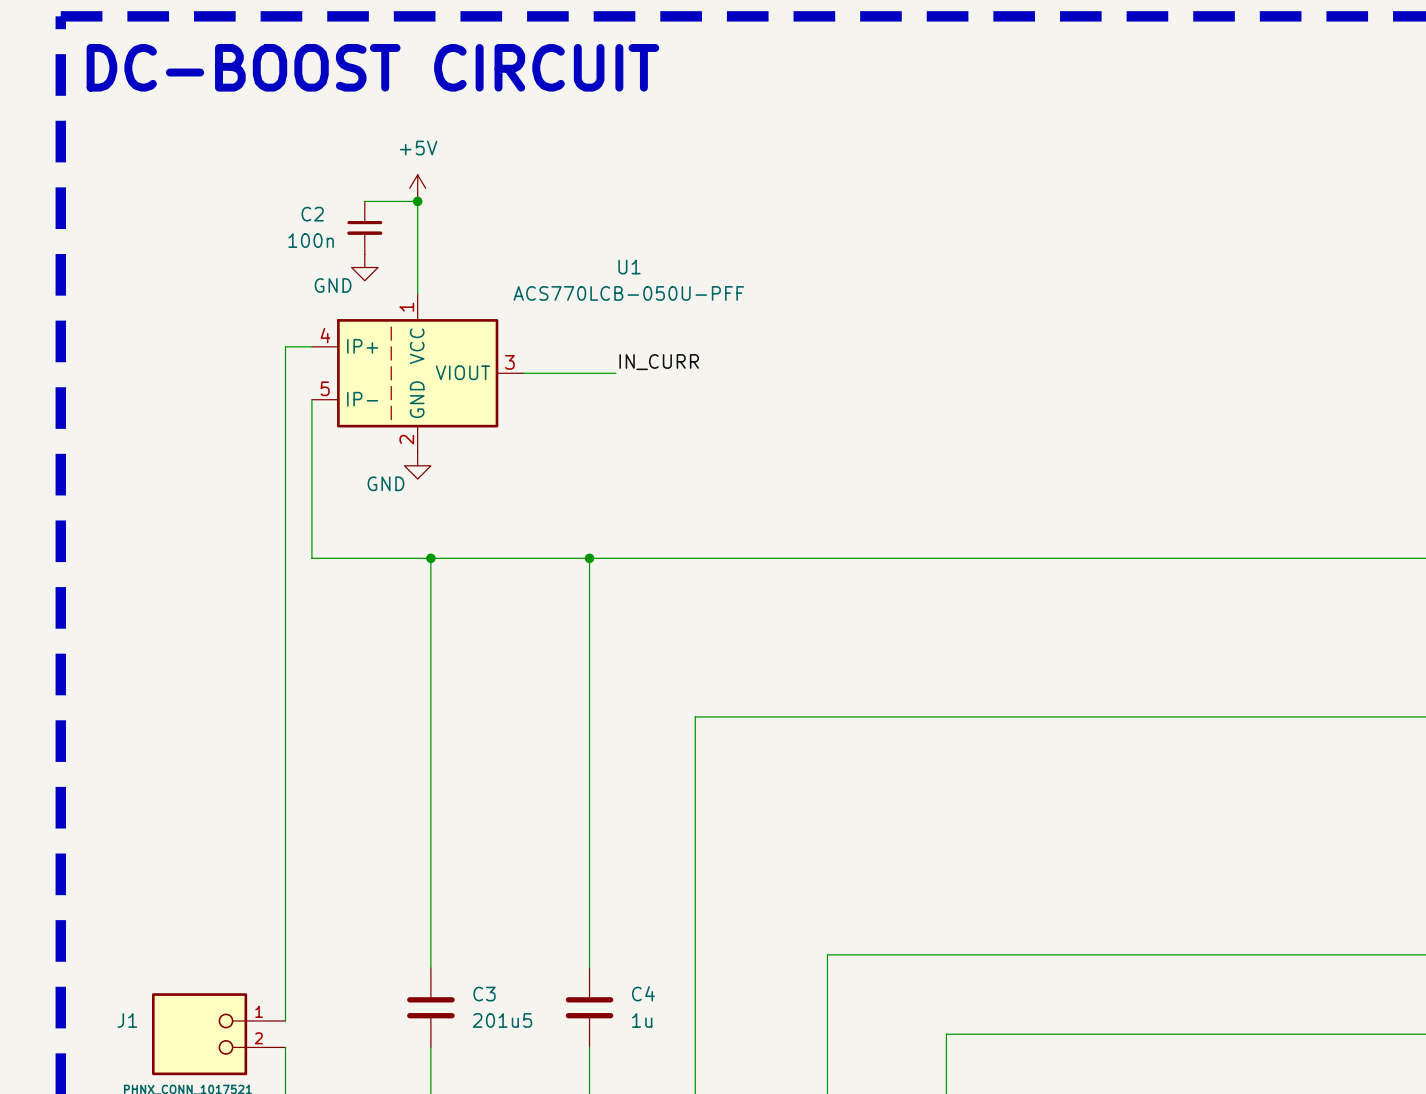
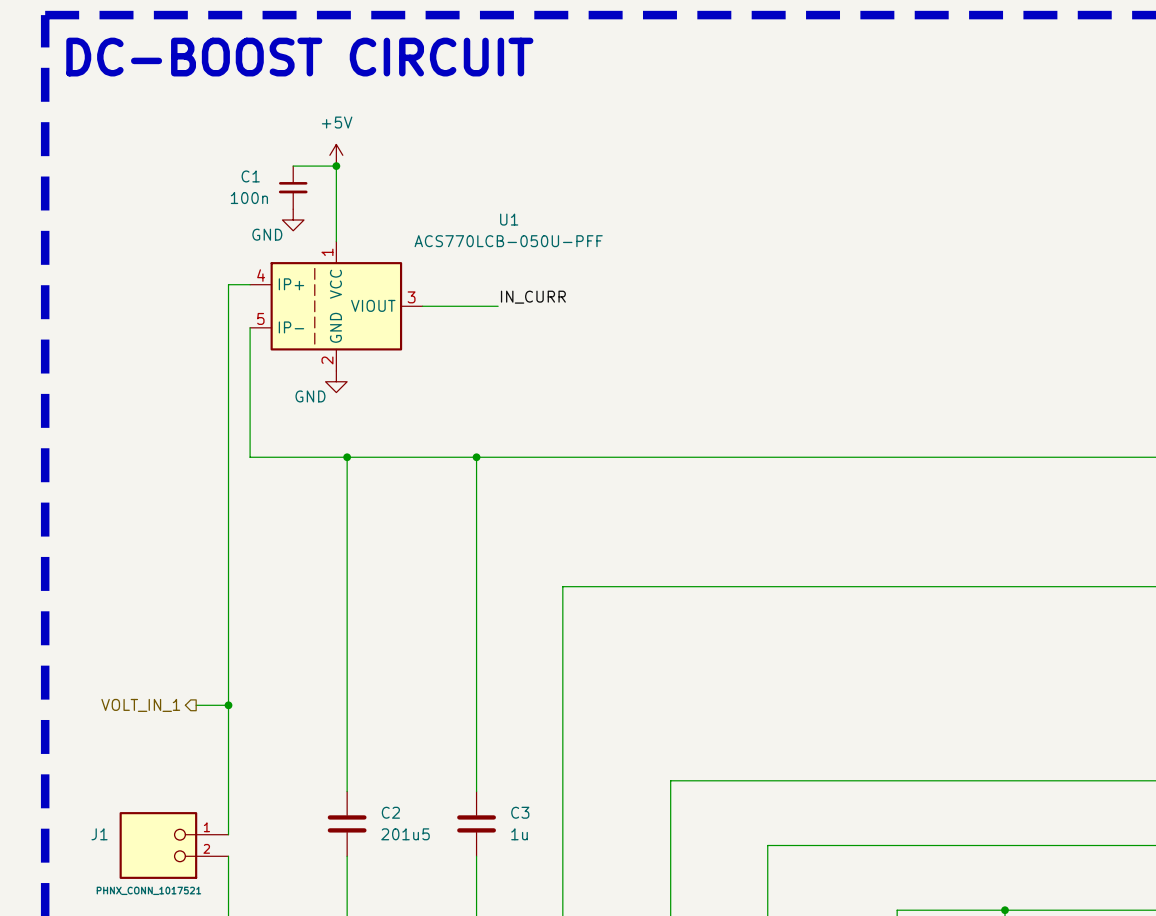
C2 name: C2 (312, 214) -> C1 (250, 176)
hierarchical label: none -> VOLT_IN_1 (140, 705)
wire: none -> (196, 705) (228, 705)
junction: none -> (228, 705)
C4 name: C4 (643, 993) -> C3 (520, 812)
C3 name: C3 (484, 994) -> C2 (390, 812)

